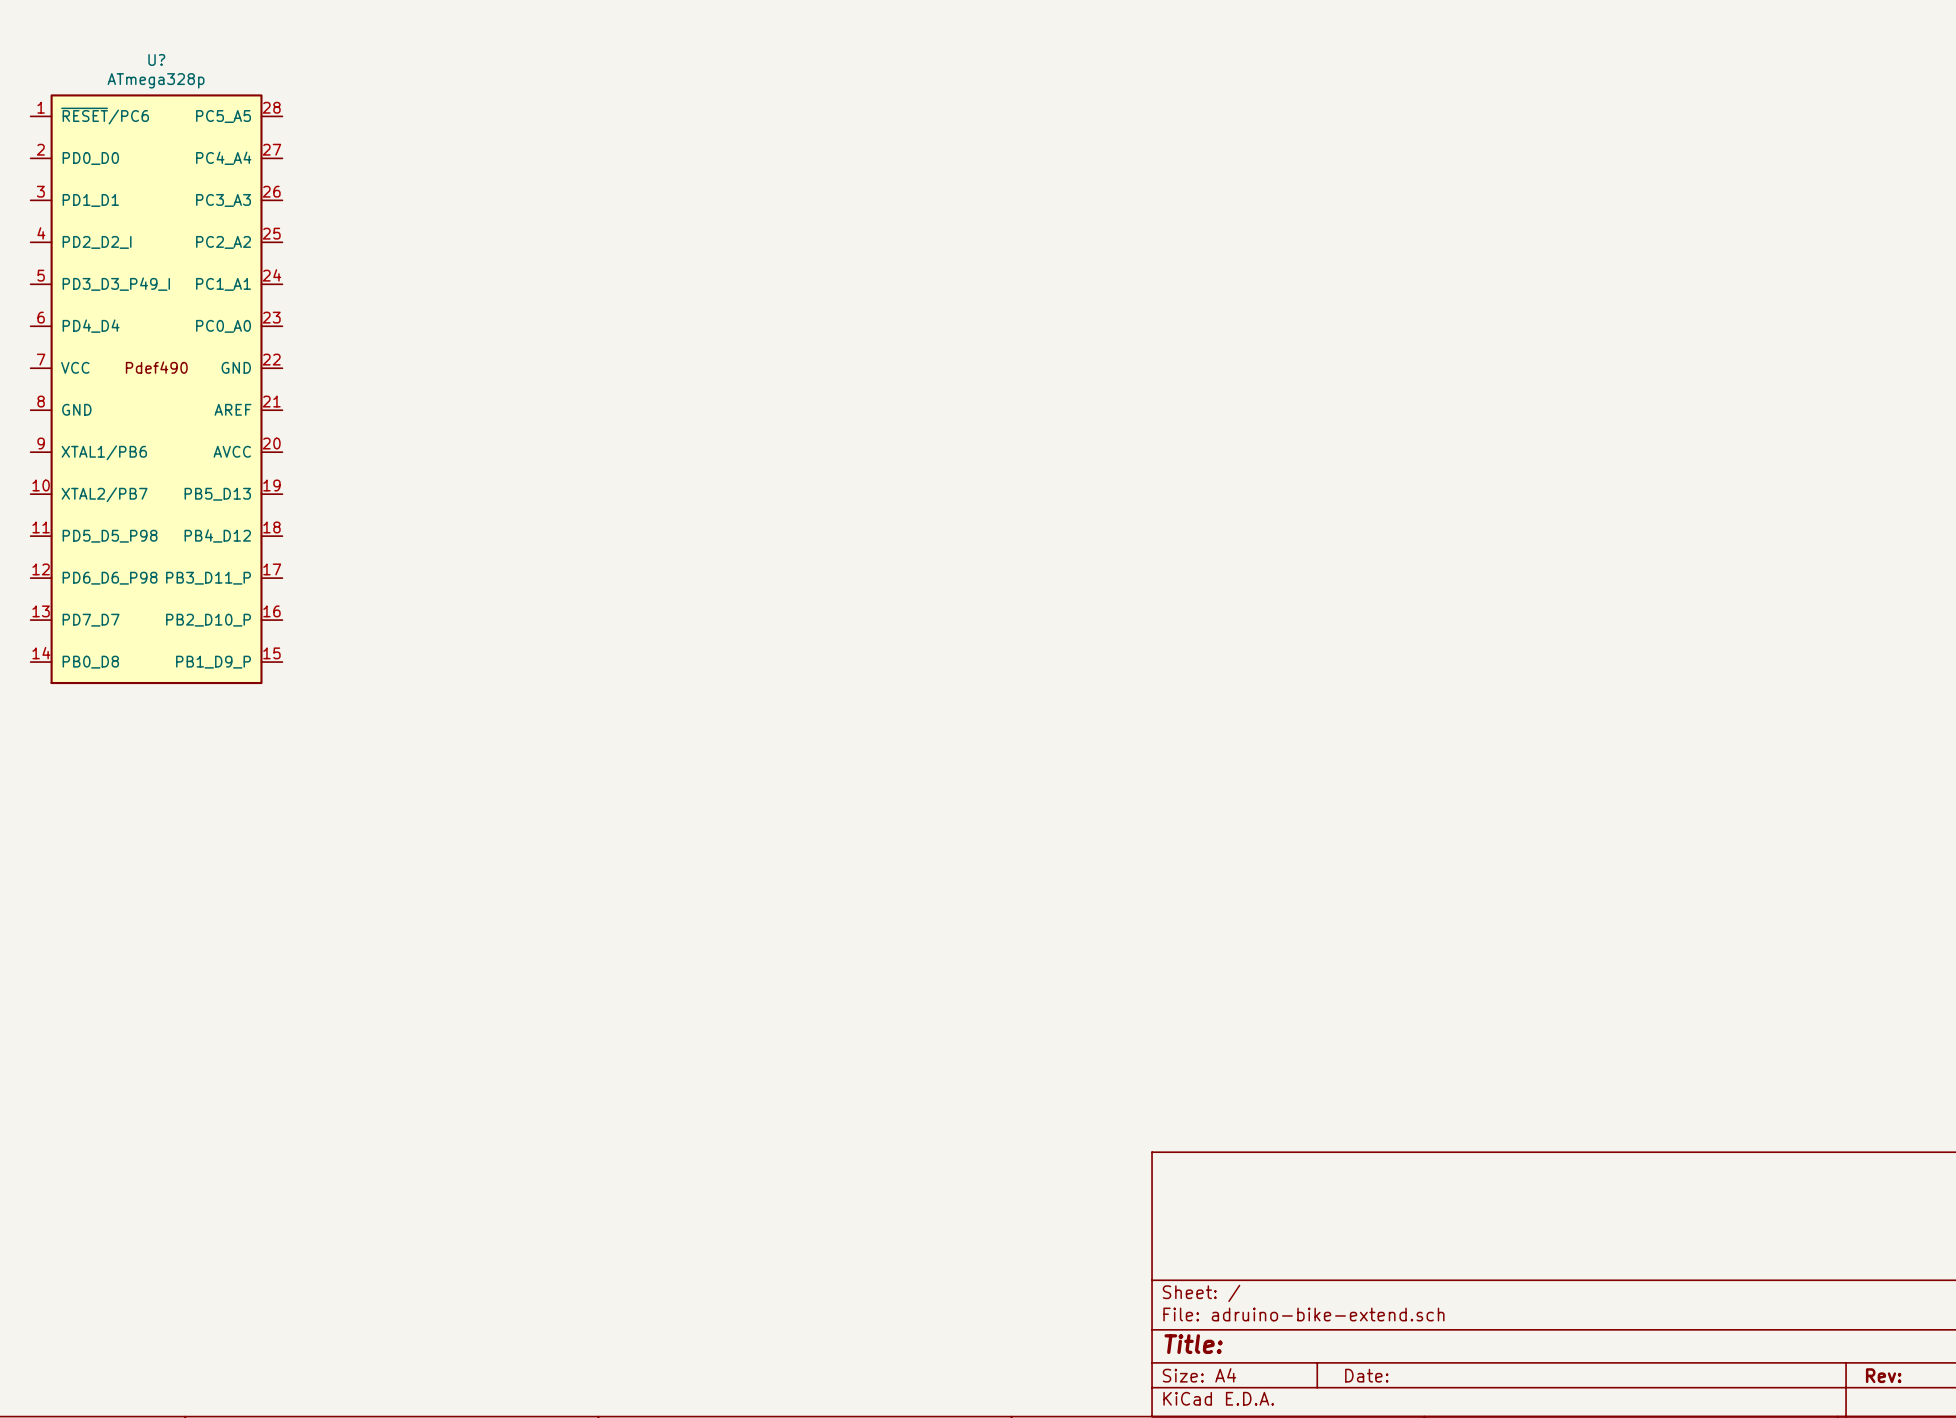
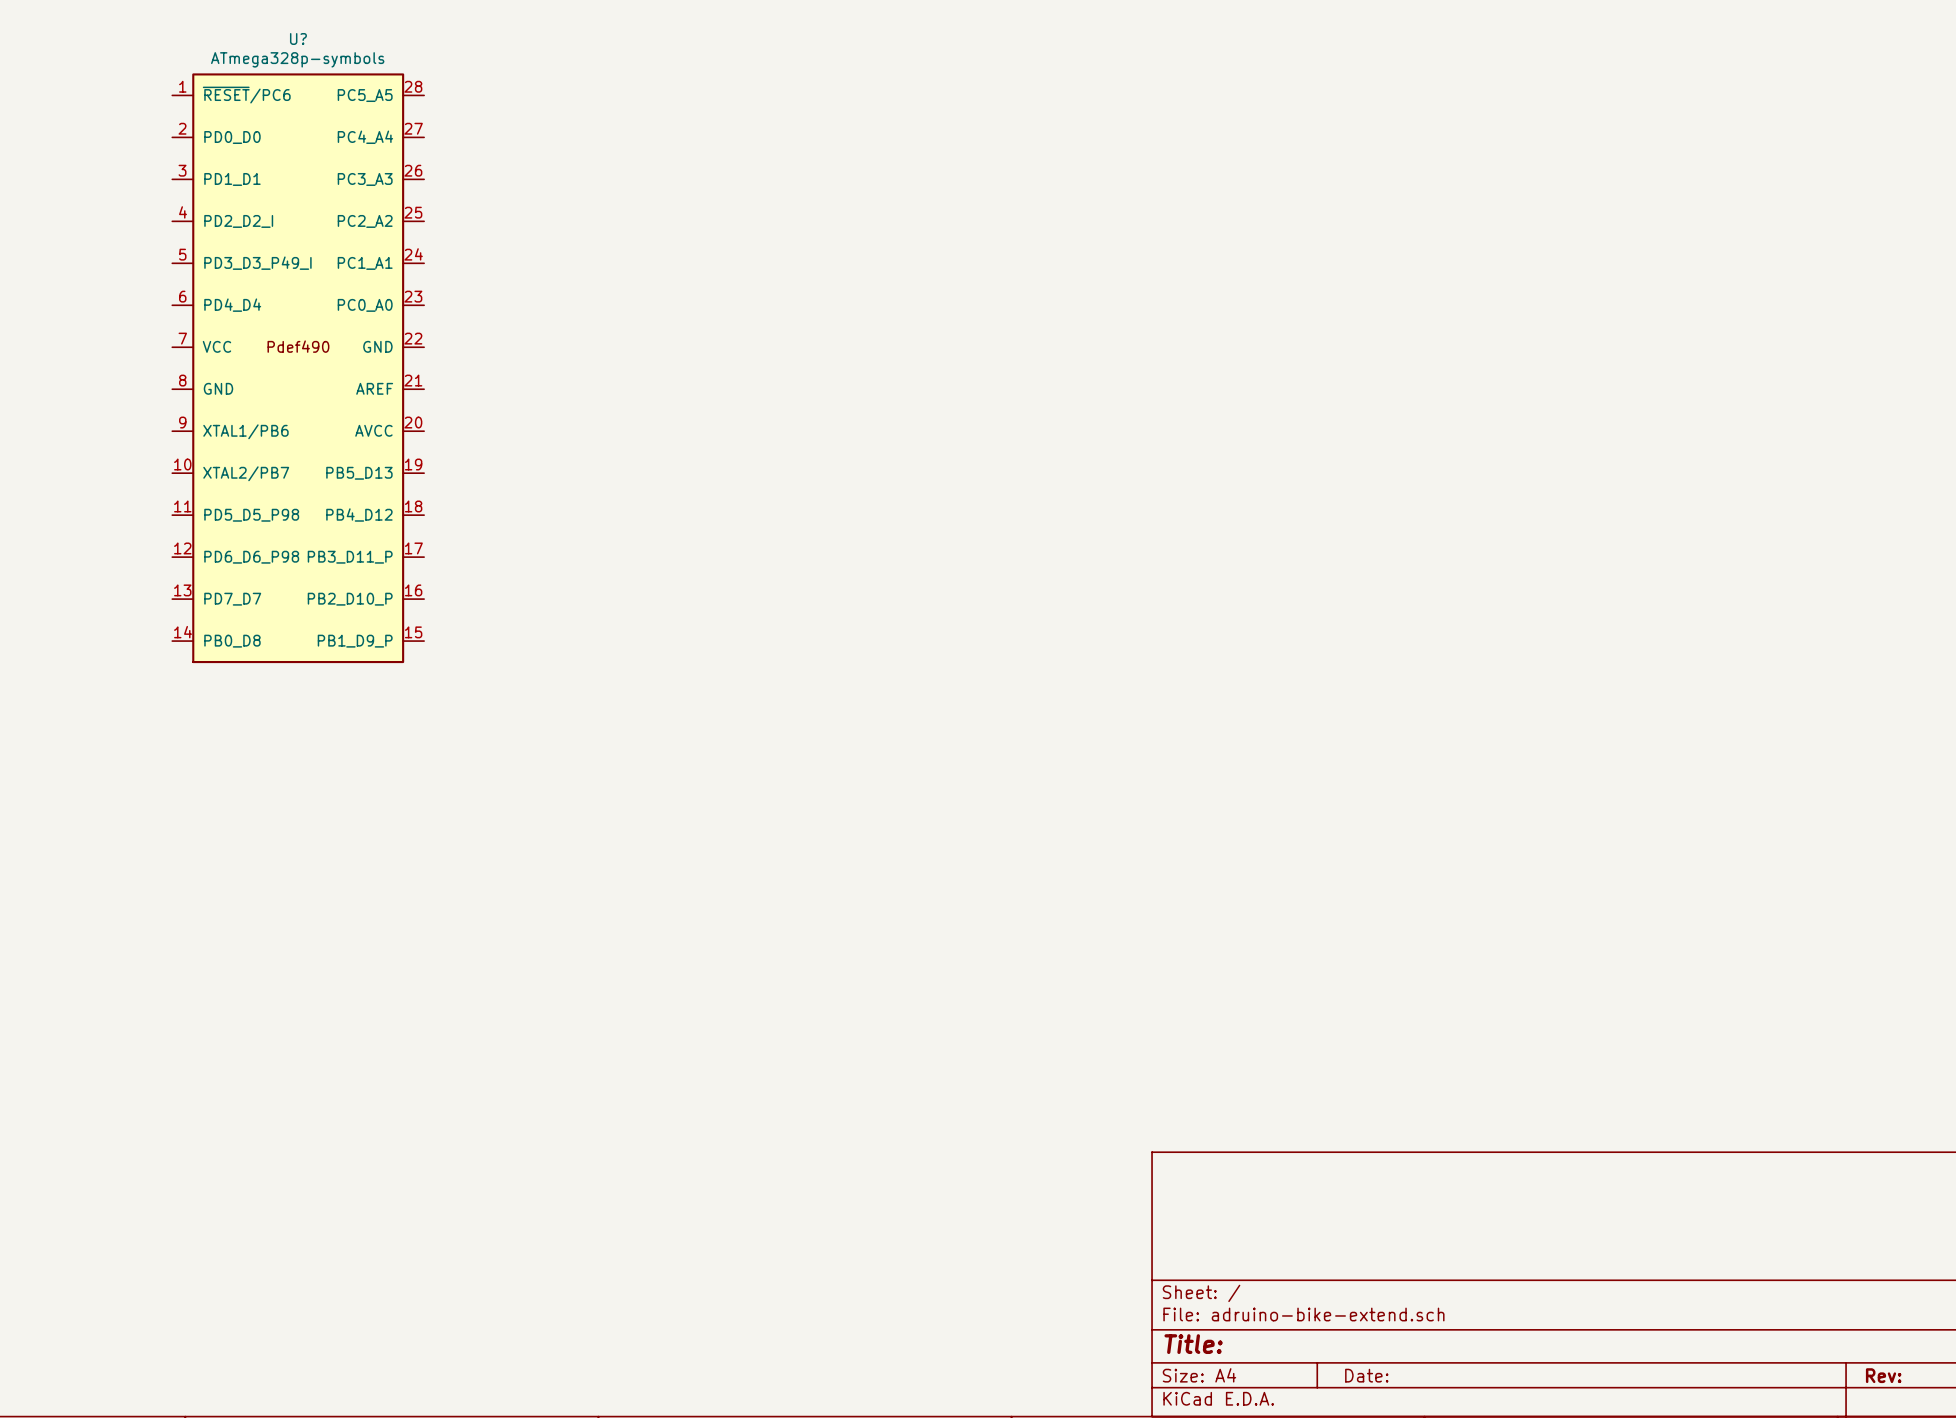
U?: none -> ATmega328p-symbols (298, 368)
U?: ATmega328p (156, 389) -> none

